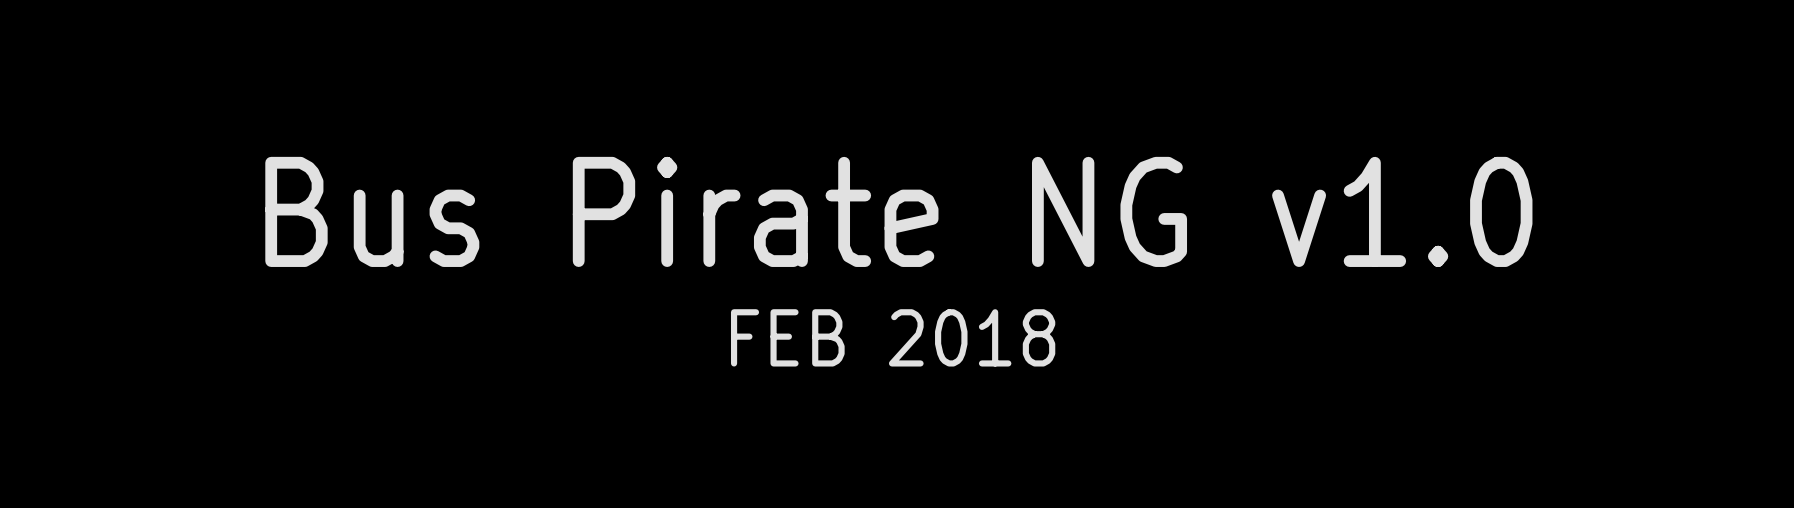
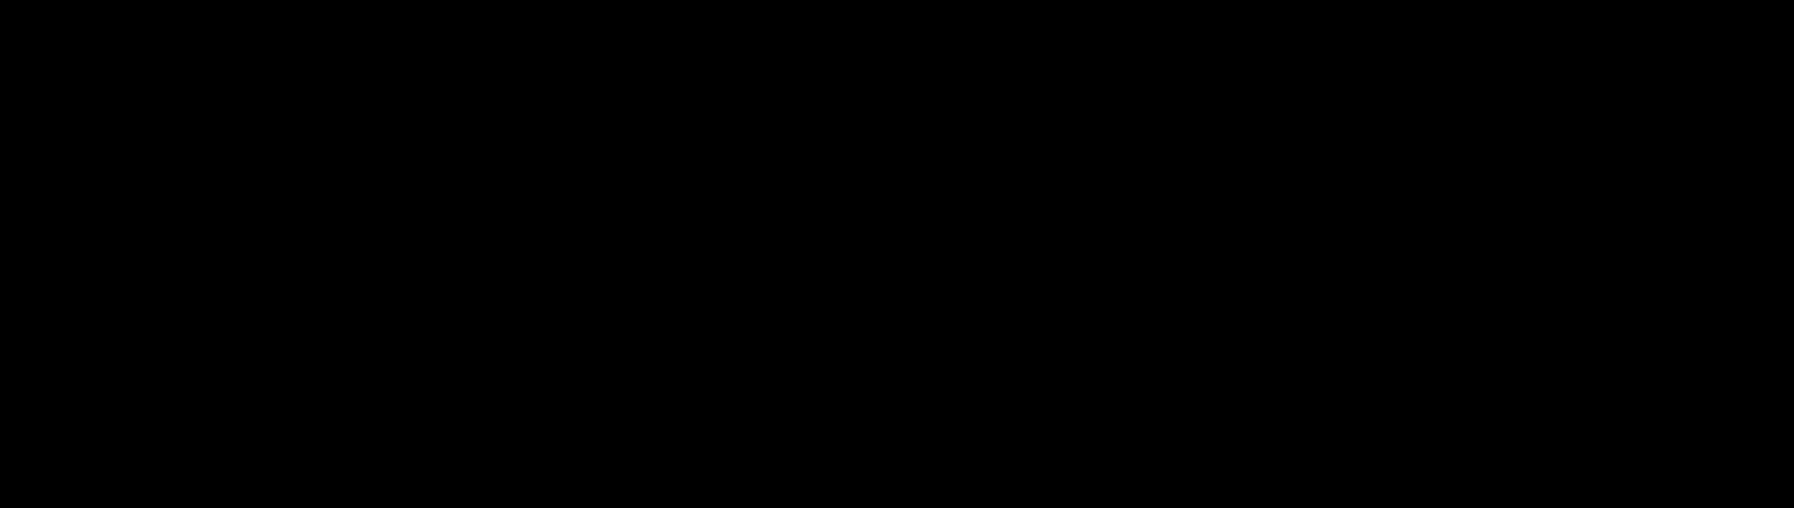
text: Bus Pirate NG v1.0 (898, 211) -> none
text: FEB 2018 (893, 337) -> none

